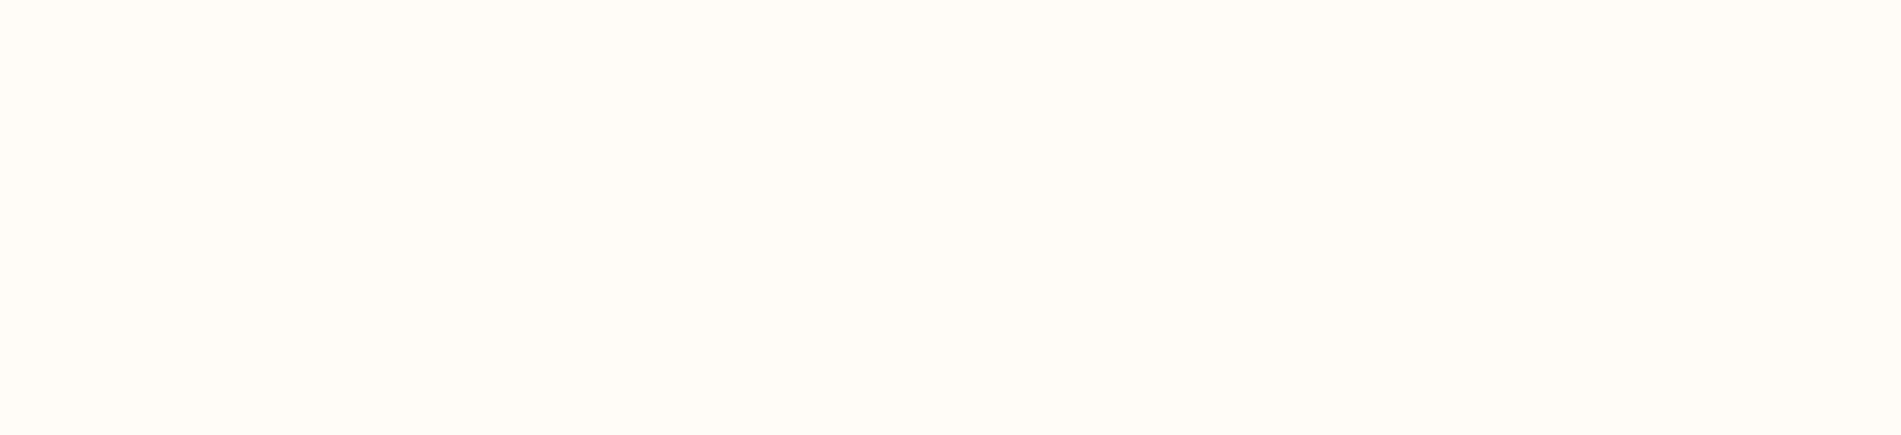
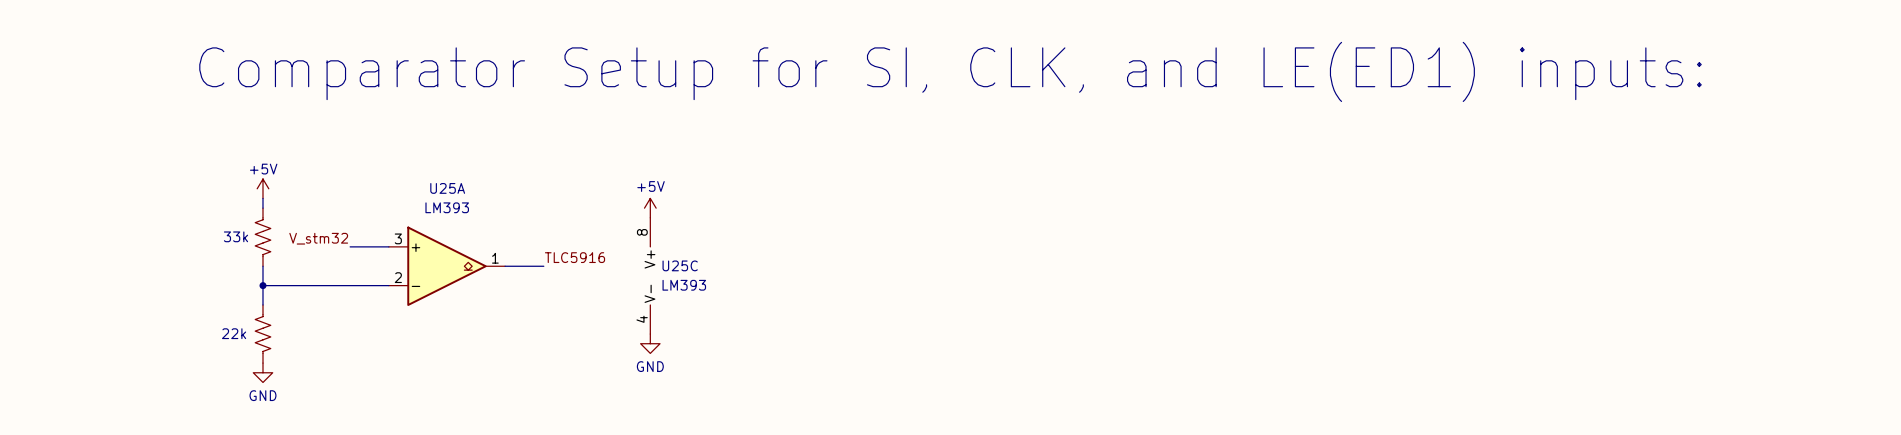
text: none -> Comparator Setup for SI, CLK, and LE(ED1) inputs: (950, 71)
power symbol: none -> +5V (262, 188)
wire: none -> (262, 198) (262, 208)
power symbol: none -> +5V (650, 208)
part: none -> 33k (262, 237)
label: none -> V_stm32 (318, 238)
wire: none -> (350, 246) (388, 246)
label: none -> TLC5916 (575, 257)
wire: none -> (262, 266) (262, 304)
U25A: none -> LM393 (446, 266)
wire: none -> (505, 266) (543, 266)
U25C: none -> LM393 (650, 275)
wire: none -> (262, 285) (388, 285)
junction: none -> (262, 285)
part: none -> 22k (262, 334)
power symbol: none -> GND (650, 343)
power symbol: none -> GND (262, 372)

